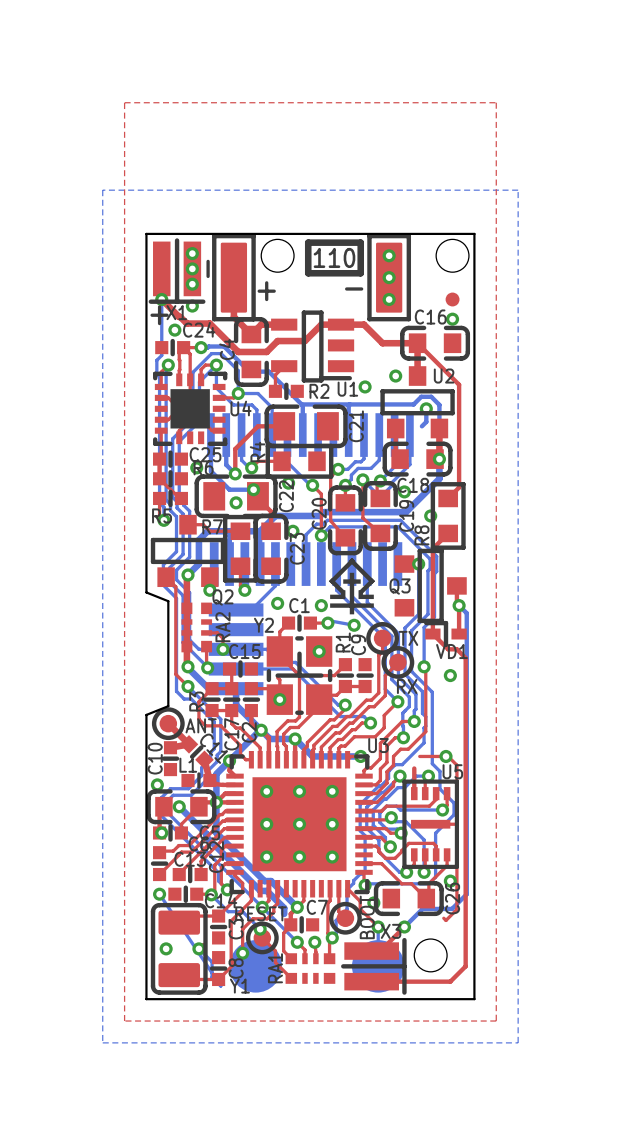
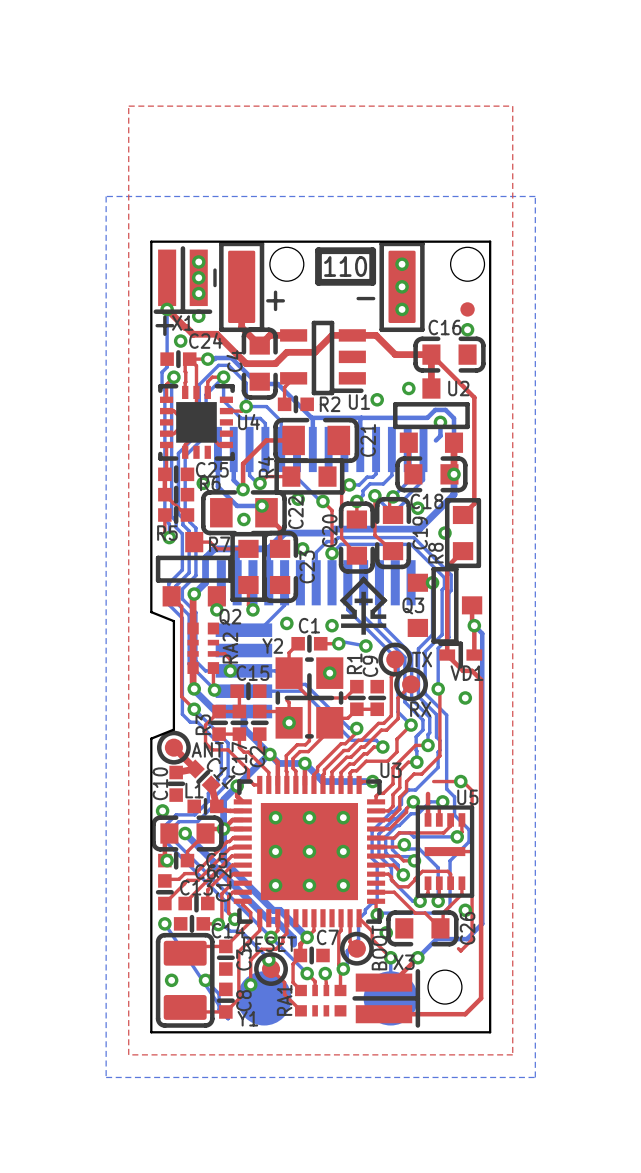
bottom track: (211, 894) (228, 911) (242, 911) (260, 929) -> none
bottom track: none -> (219, 926) (225, 926) (229, 931) (241, 931) (271, 961)

